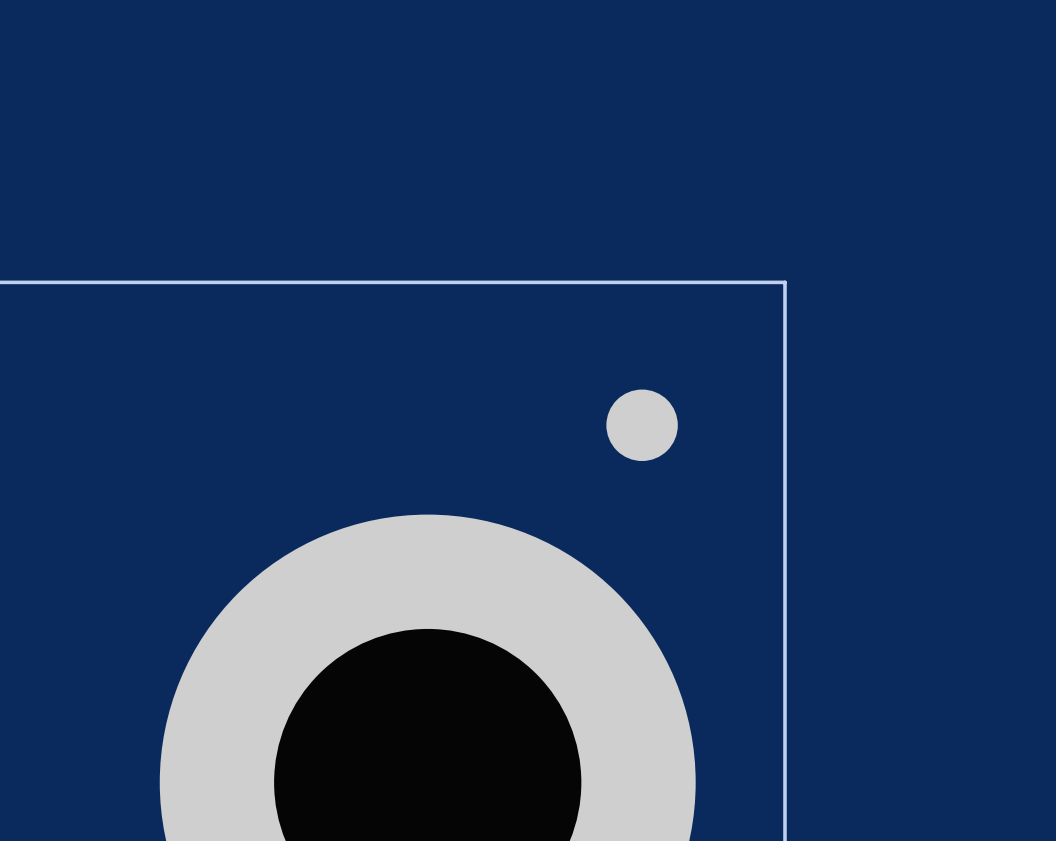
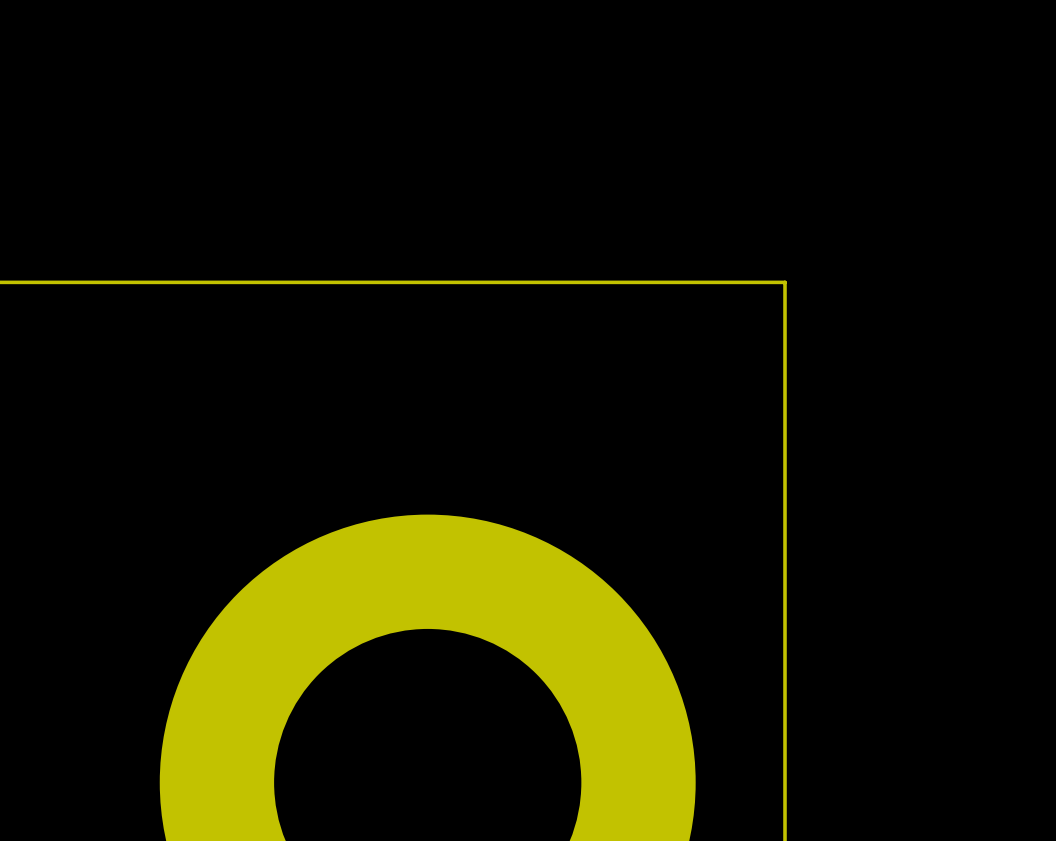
part: (642, 425) -> none

